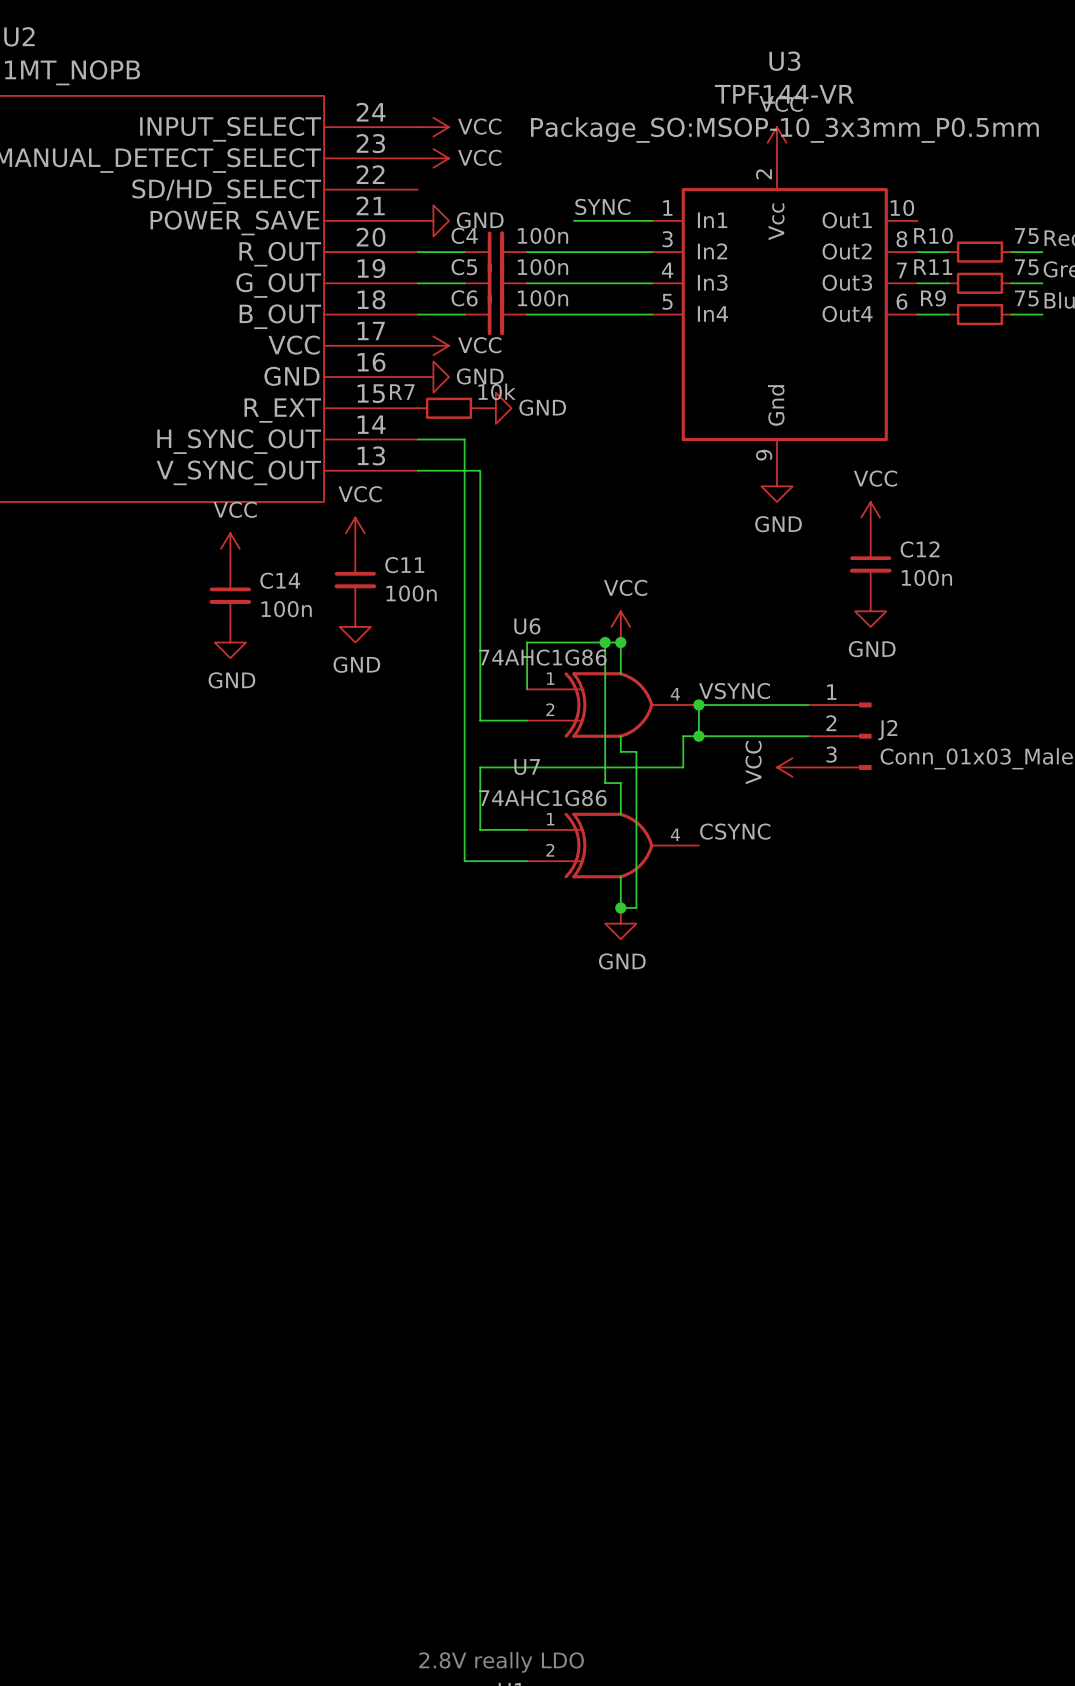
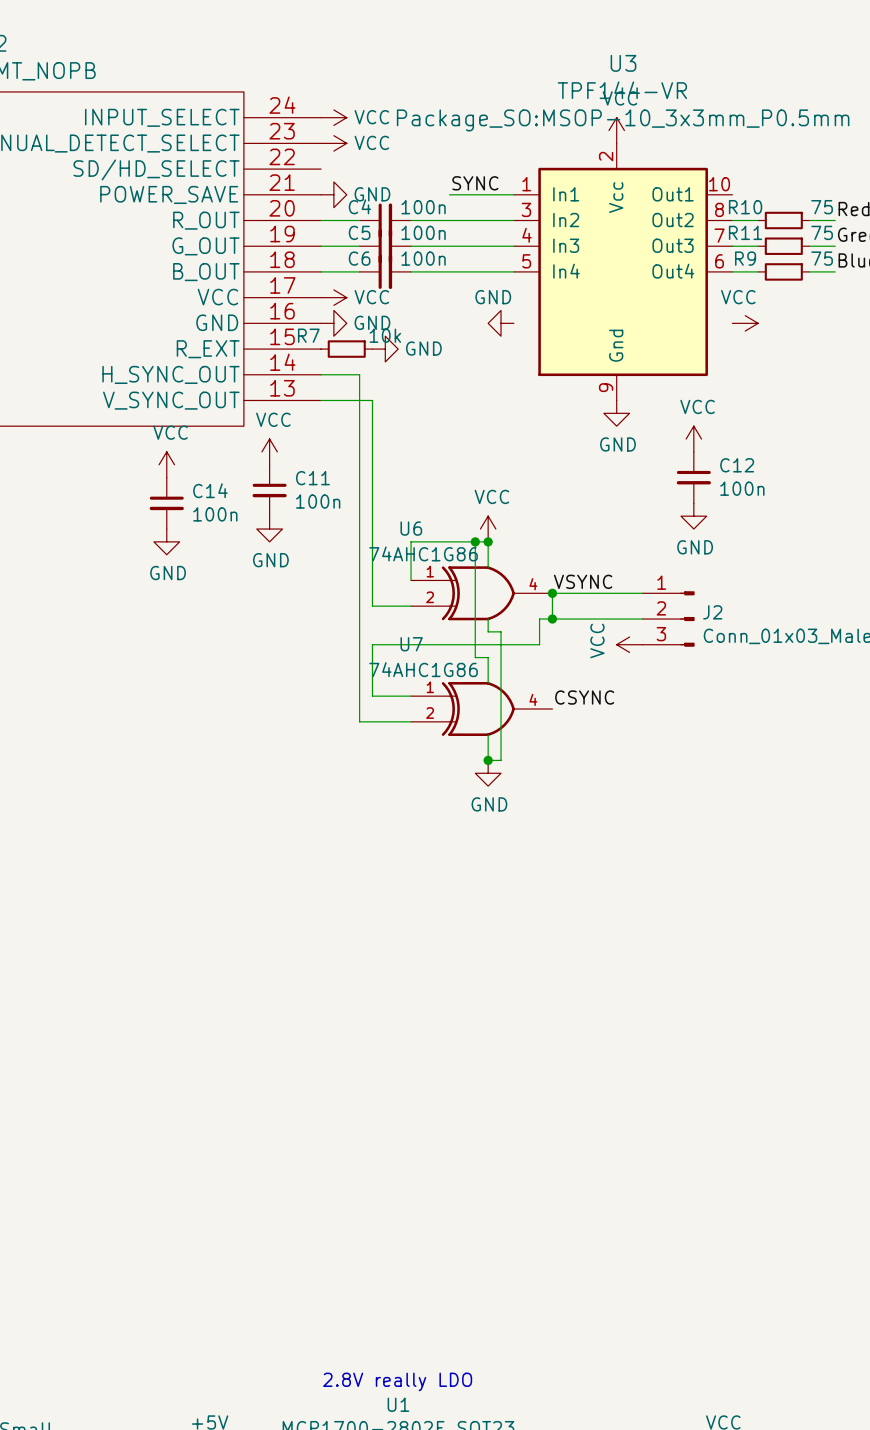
power symbol: none -> GND (501, 323)
power symbol: none -> VCC (745, 323)

